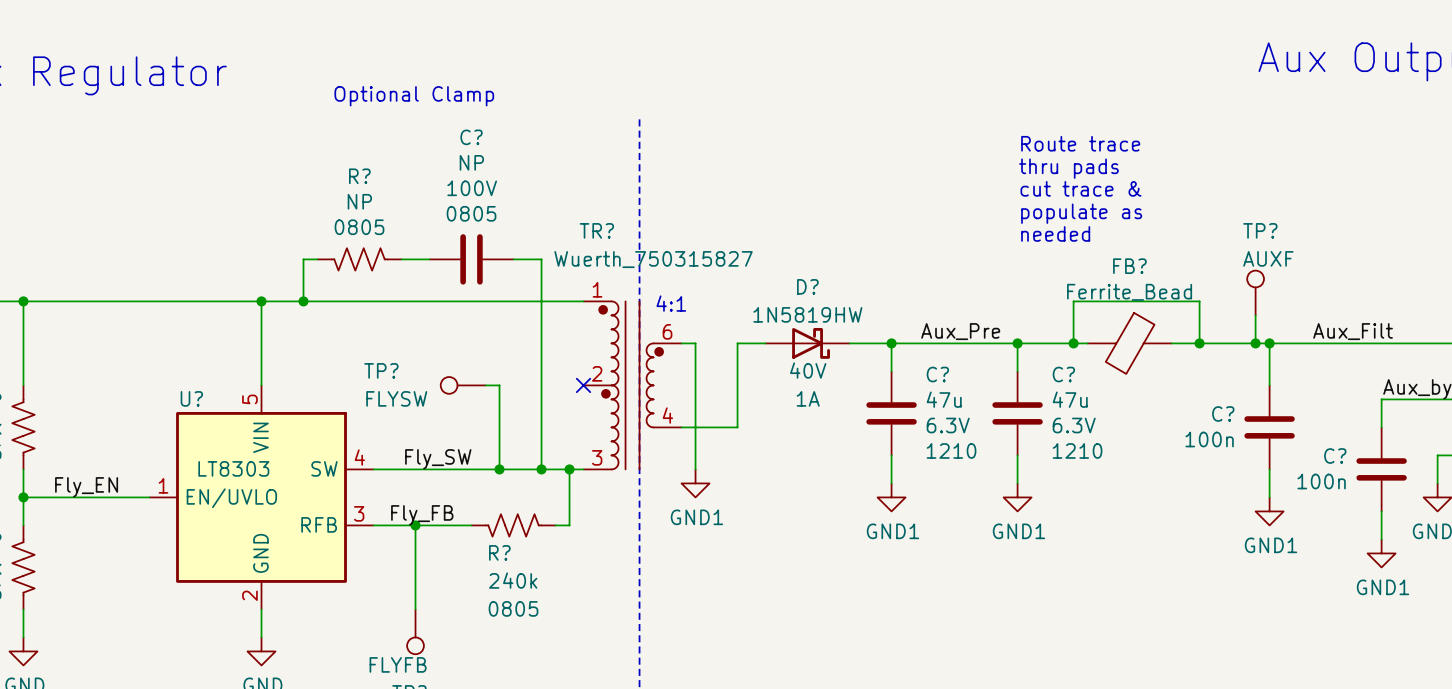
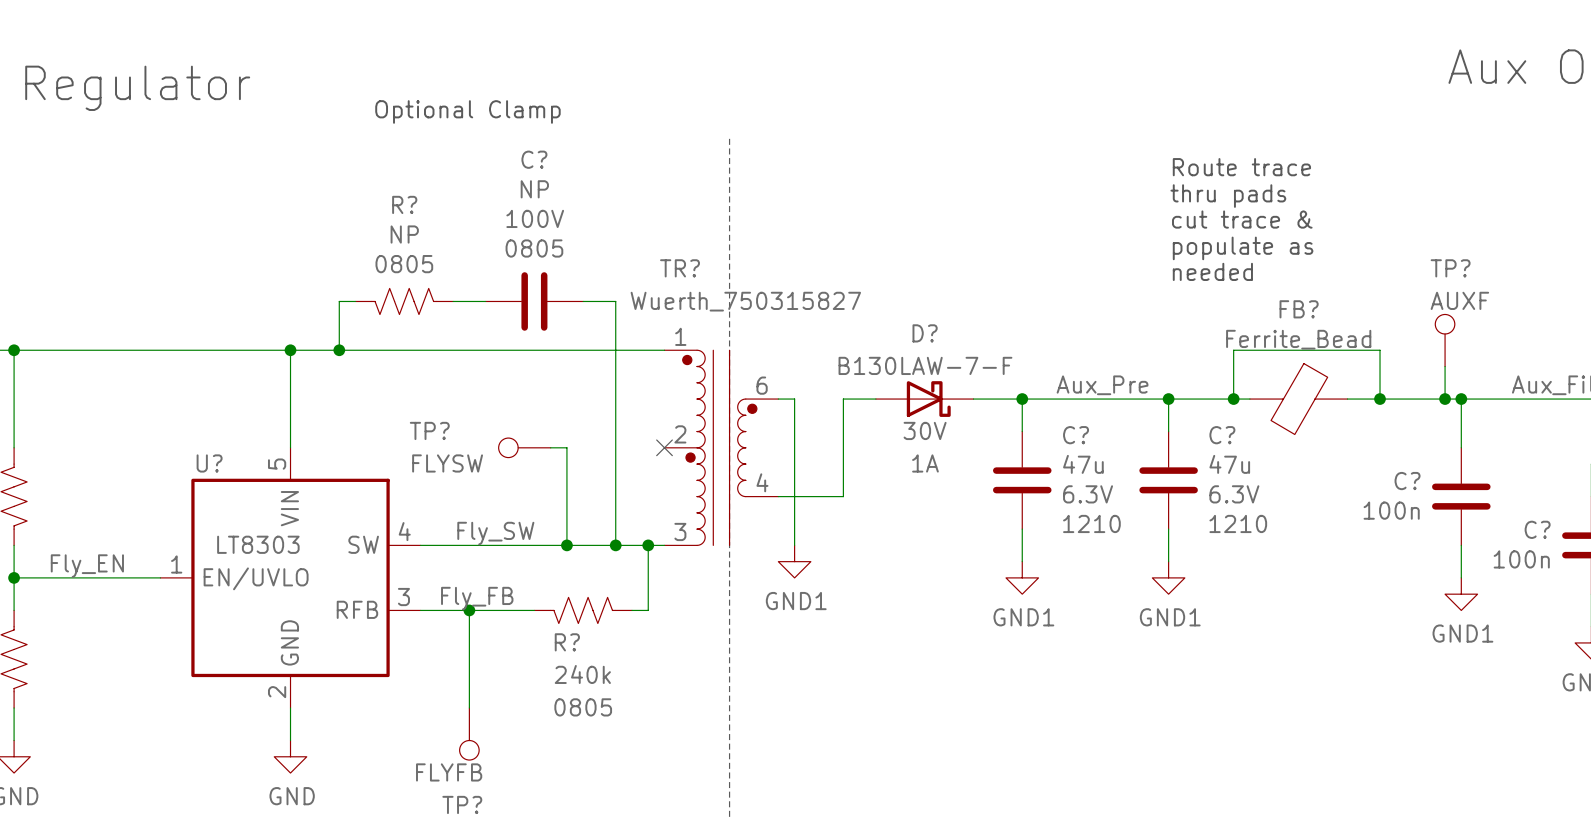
text: 4:1 (671, 303) -> none
D? value: 1N5819HW (807, 314) -> B130LAW-7-F (925, 365)
D? text: 40V (808, 370) -> 30V (925, 430)

